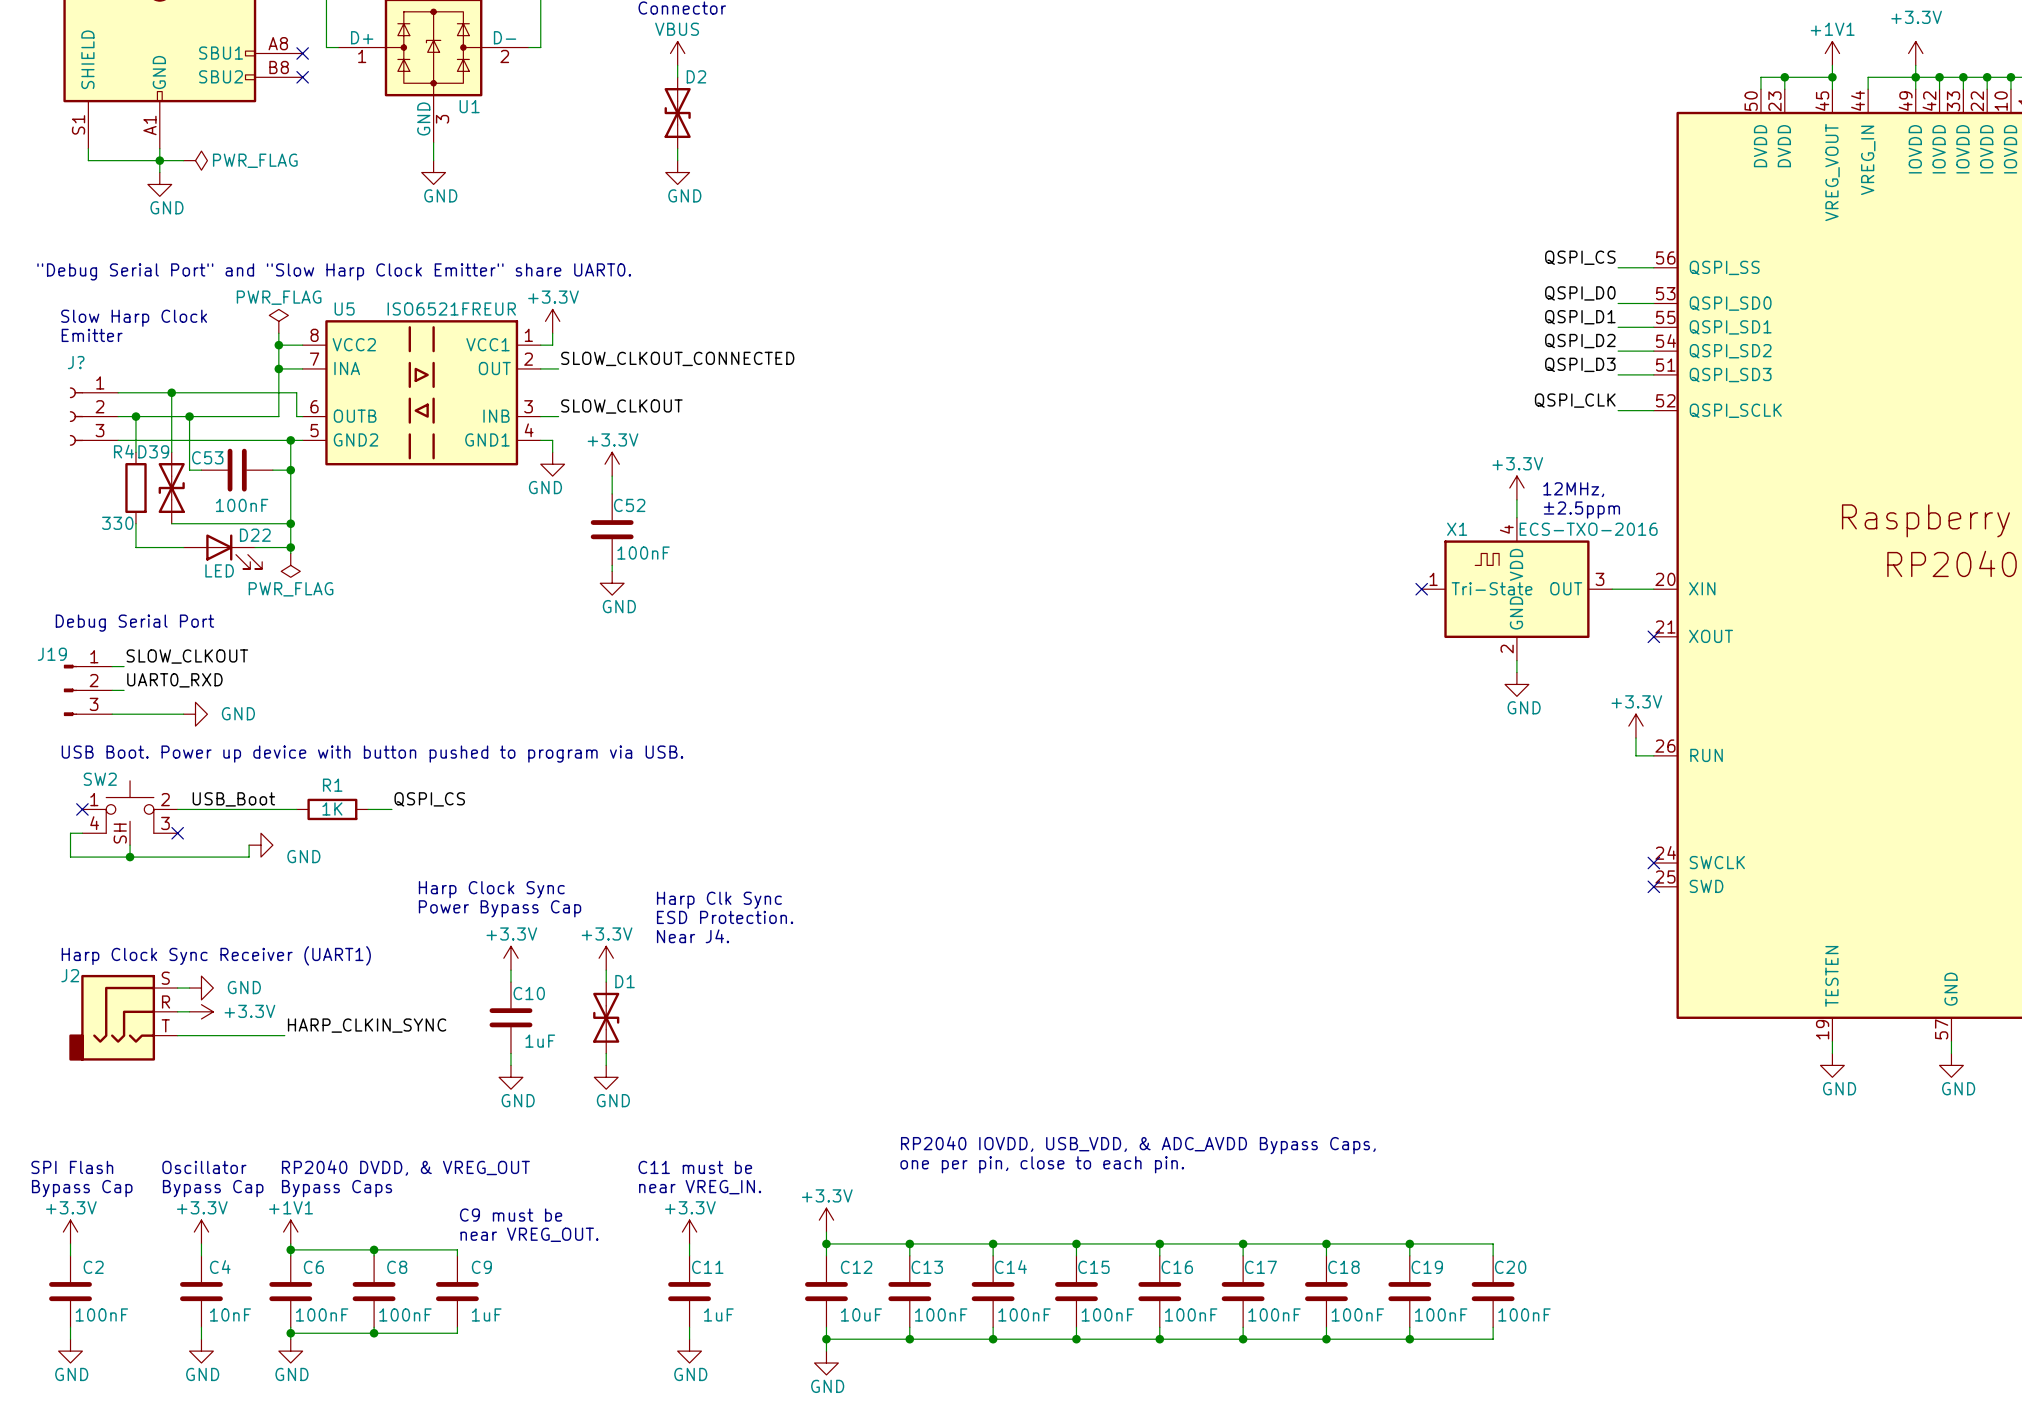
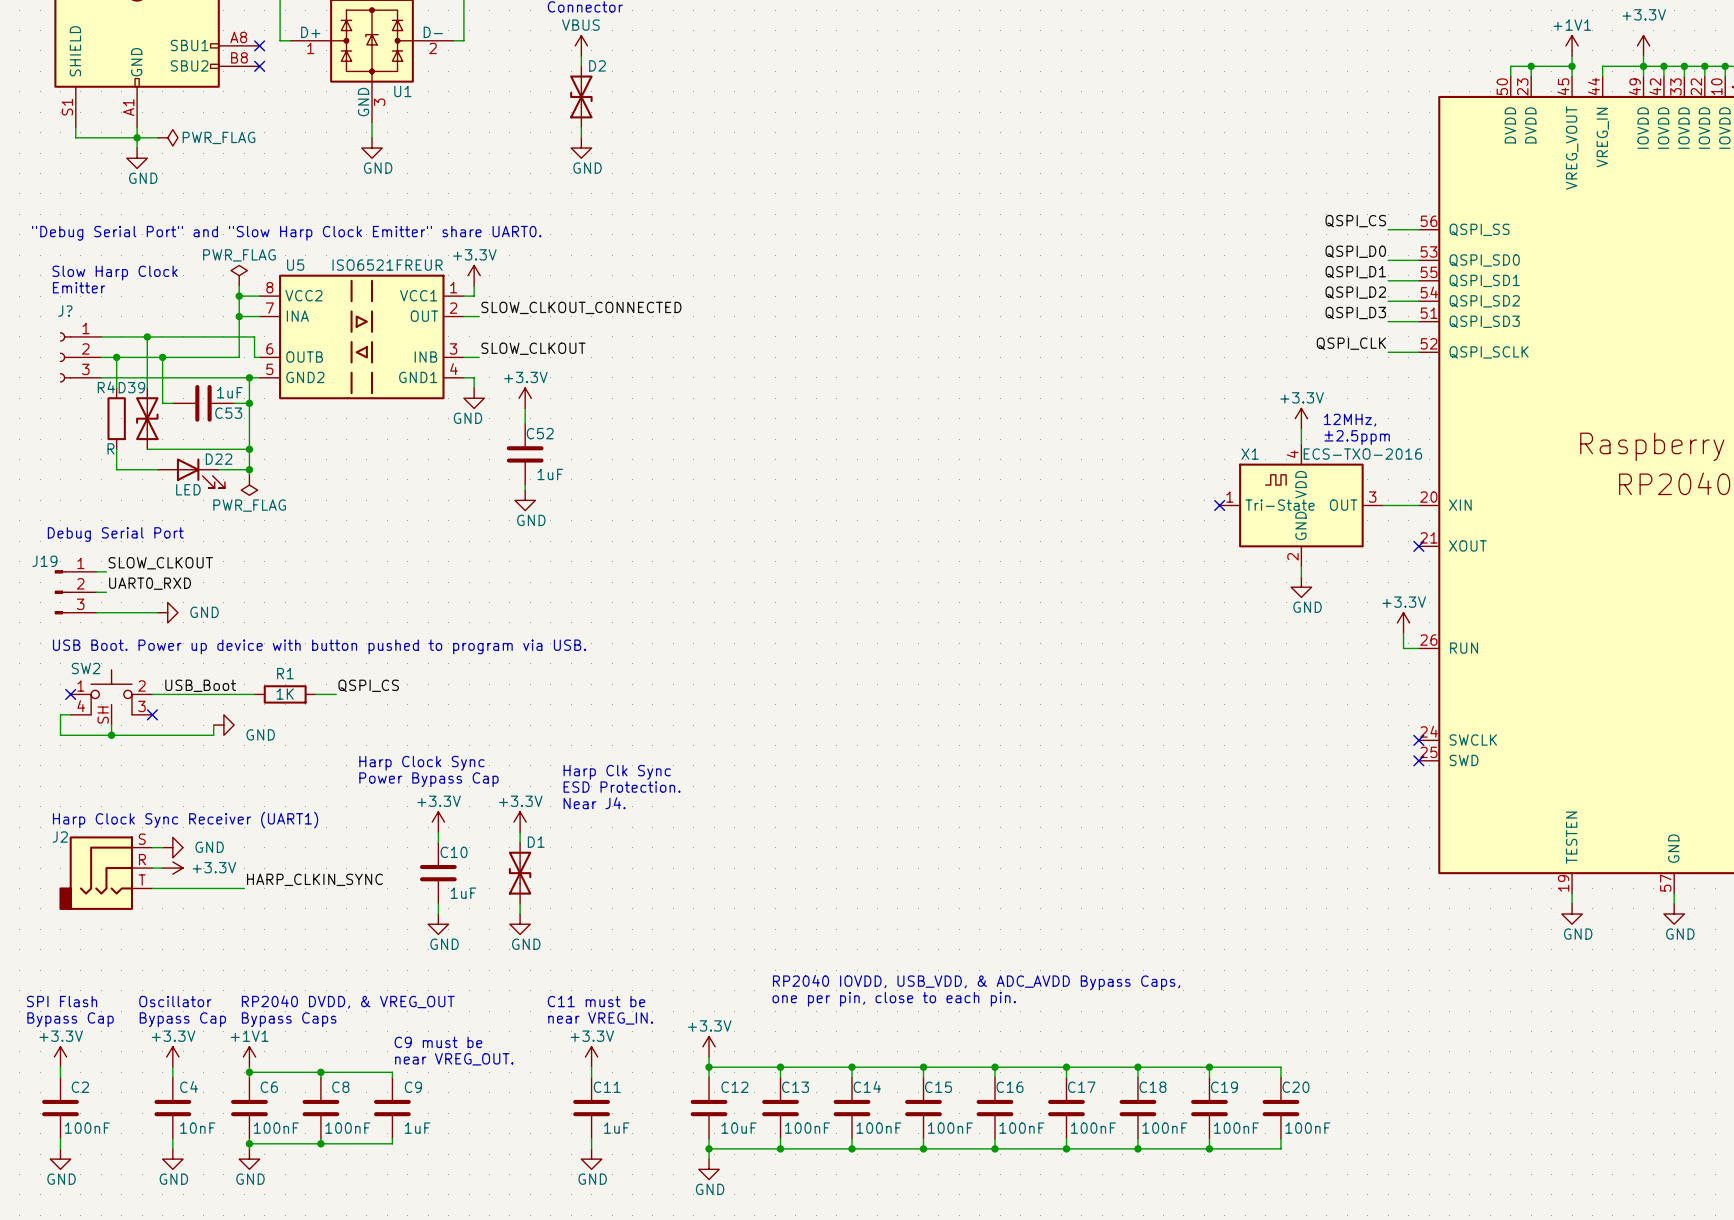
C53 name position: C53 (207, 457) -> C53 (228, 413)
C53 value: 100nF (242, 505) -> 1uF (229, 392)
R4 value: 330 (117, 523) -> R (110, 448)
C52 value: 100nF (643, 553) -> 1uF (550, 474)

